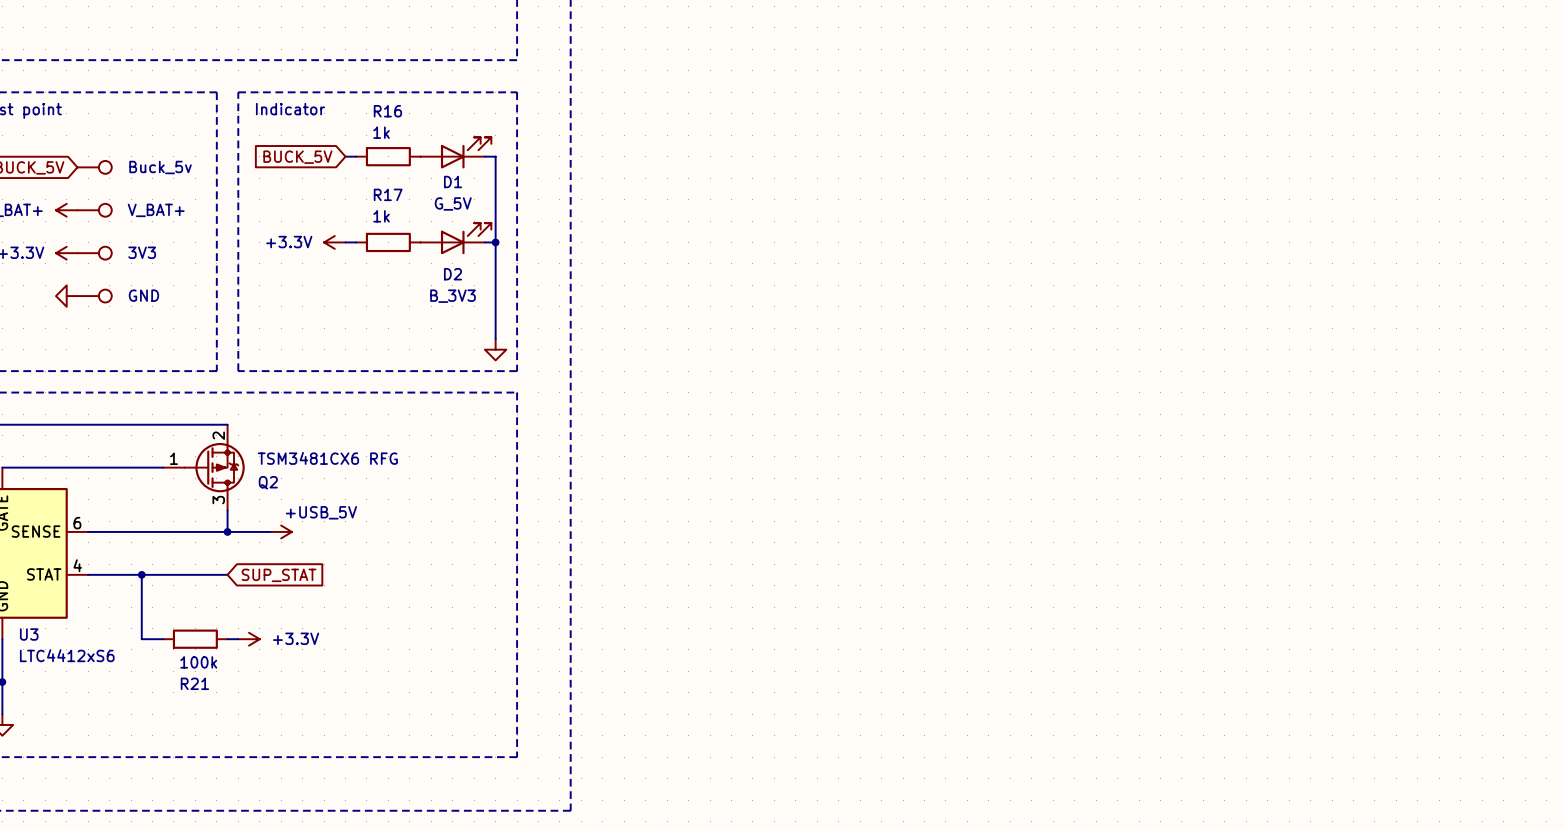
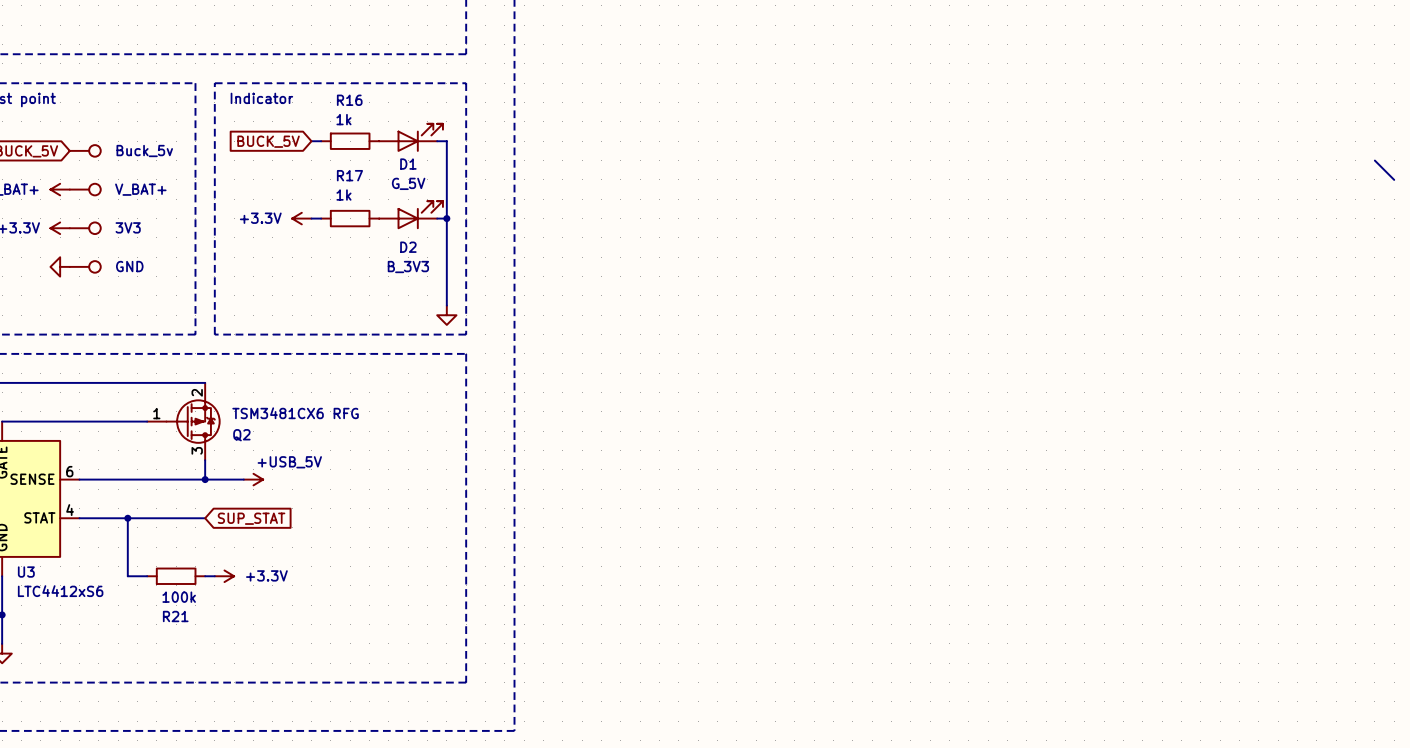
wire: none -> (1374, 160) (1394, 179)

